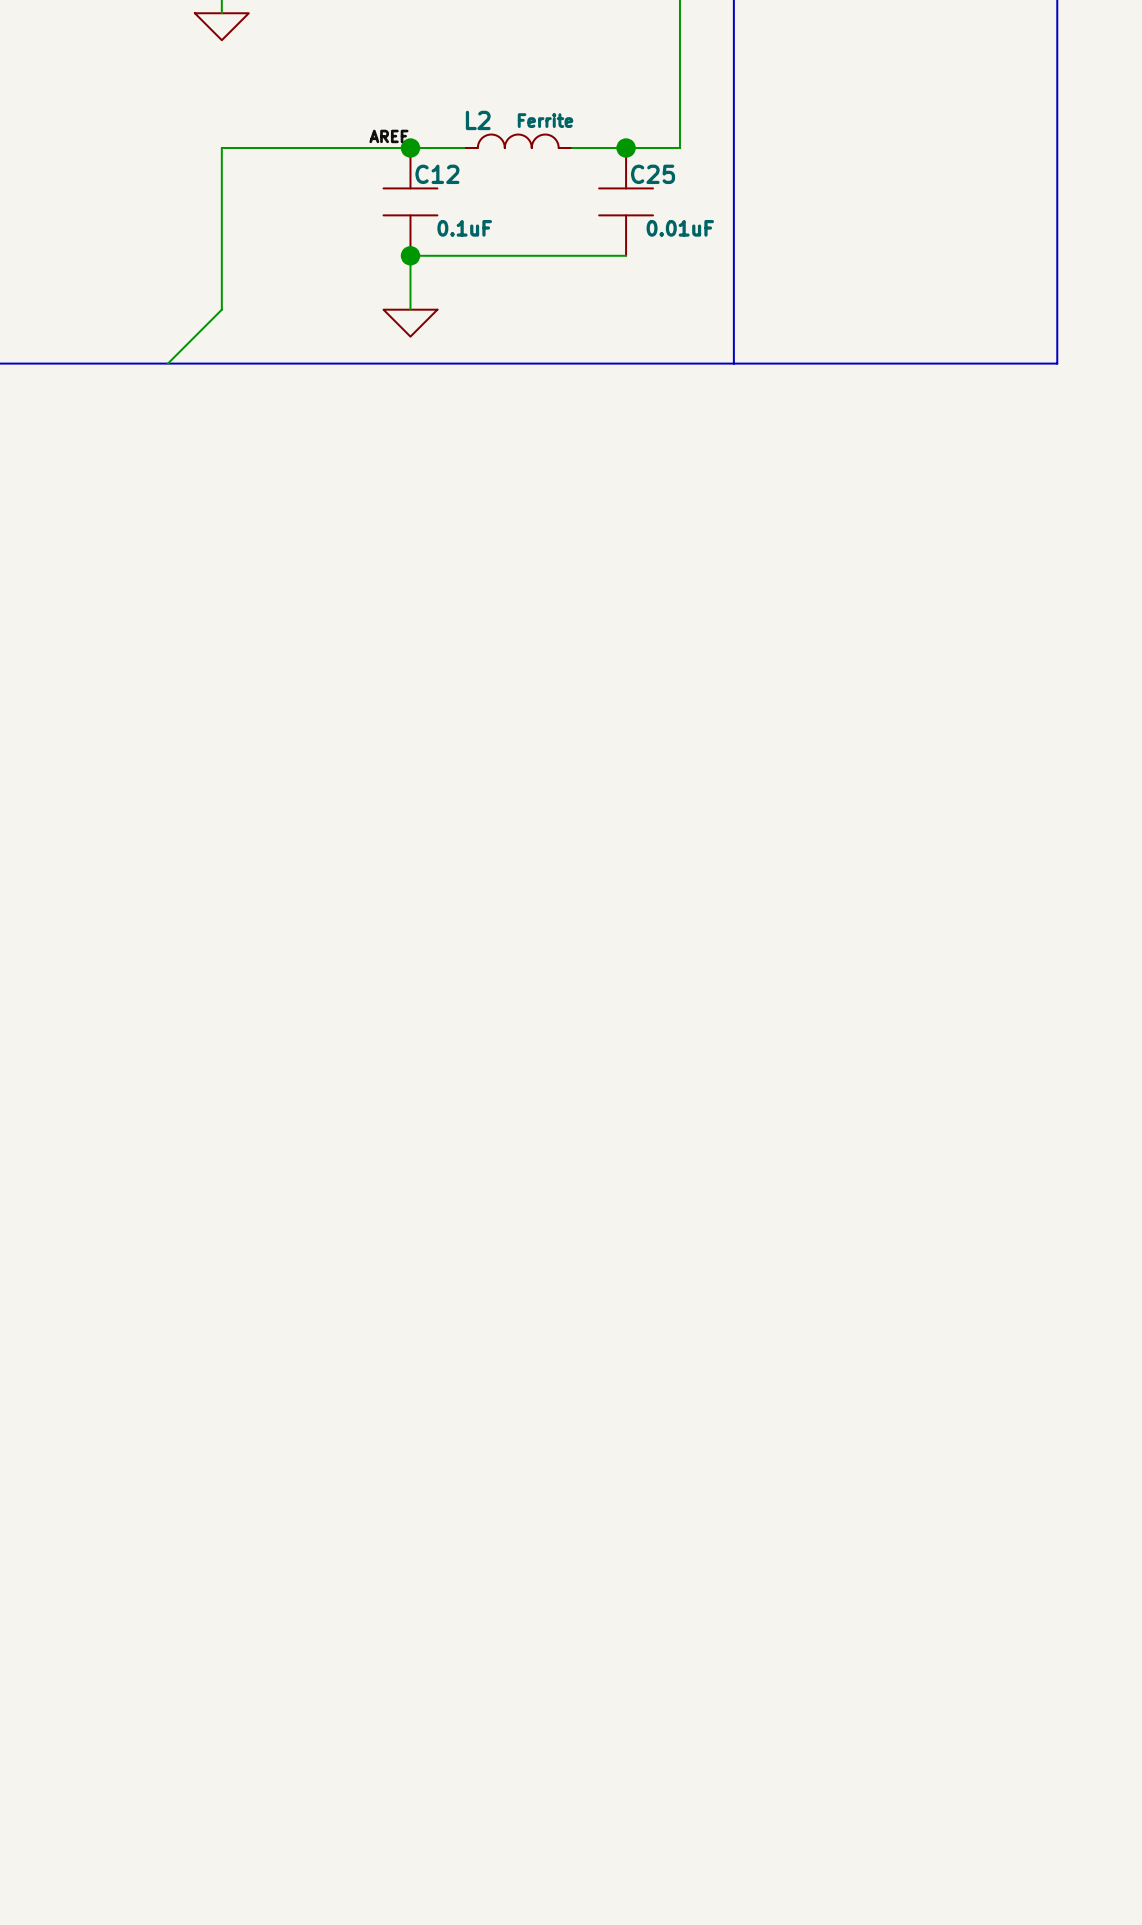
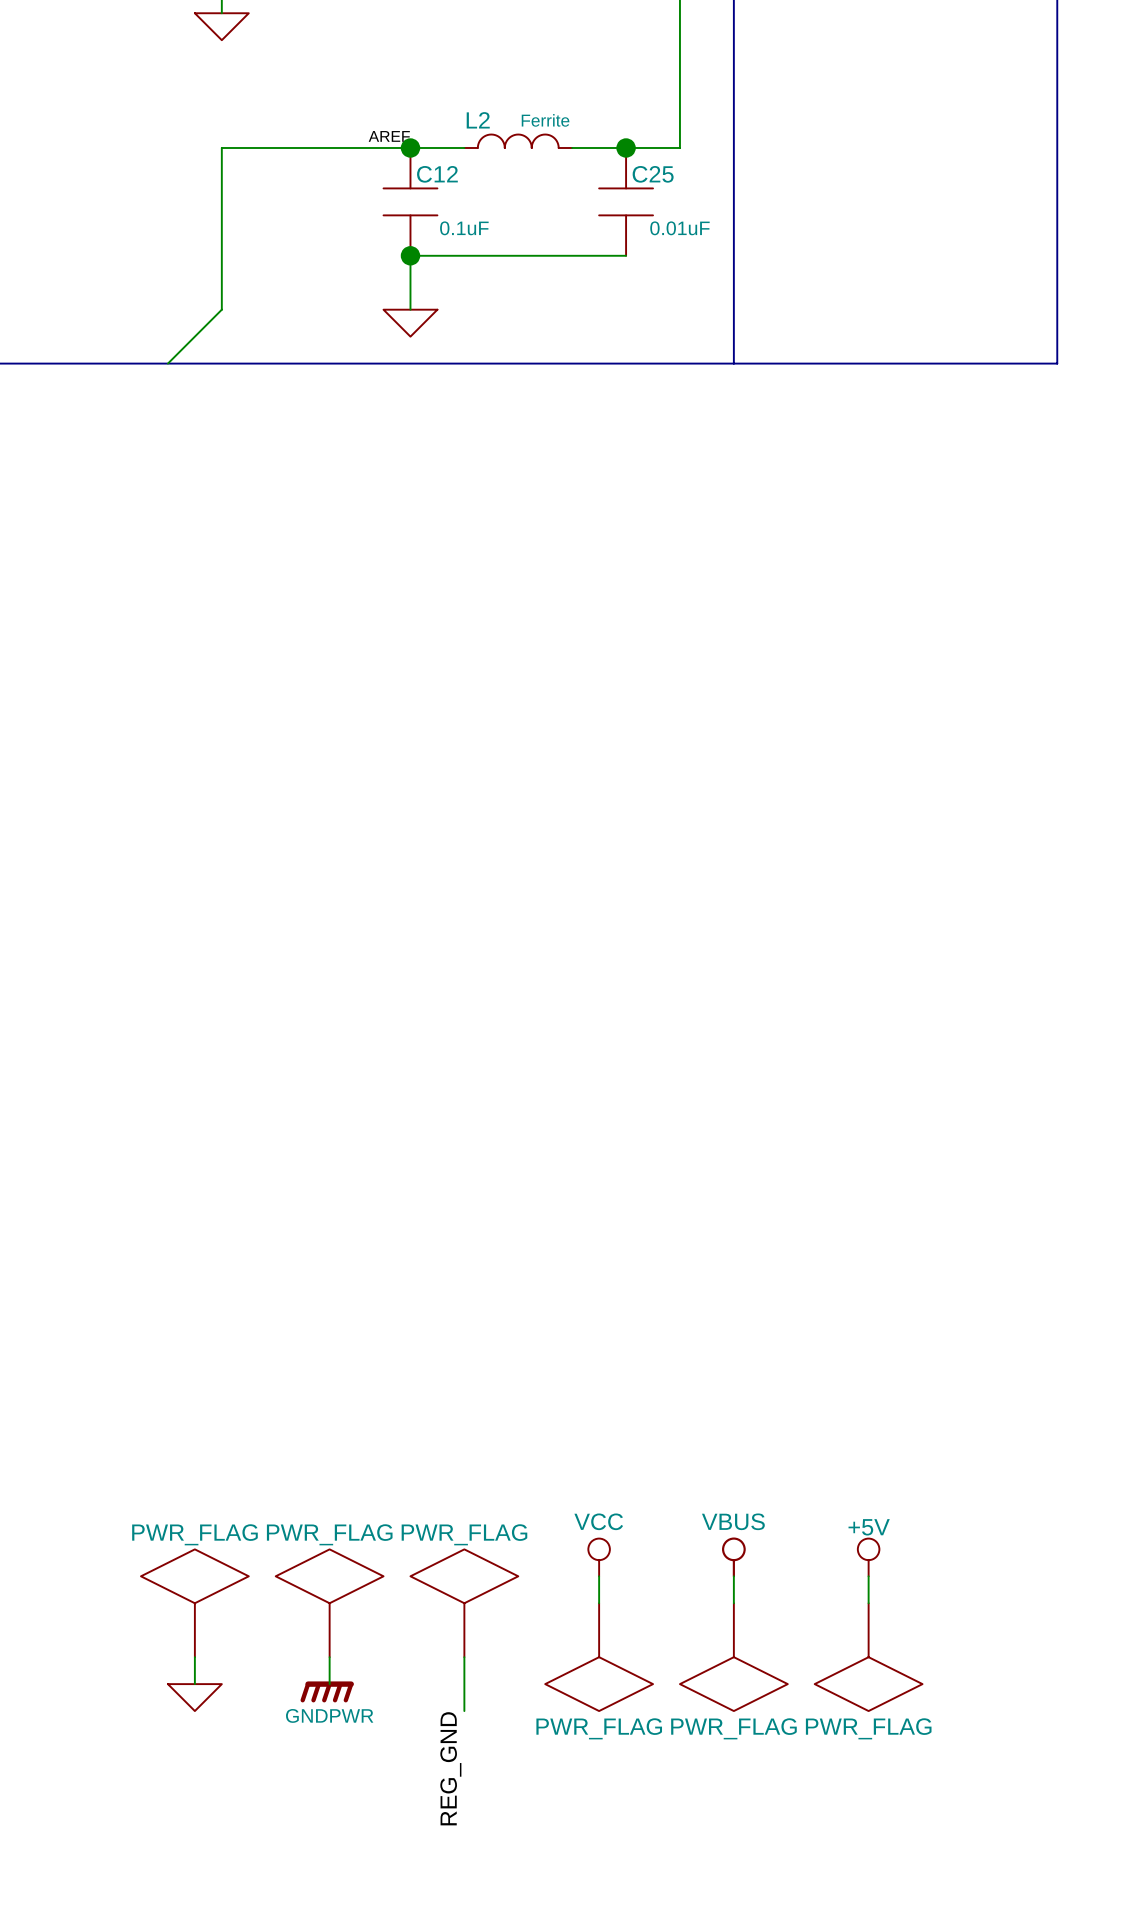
power symbol: none -> VCC (599, 1557)
power symbol: none -> VBUS (733, 1557)
power symbol: none -> +5V (868, 1557)
wire: none -> (599, 1576) (599, 1603)
wire: none -> (733, 1576) (733, 1603)
wire: none -> (868, 1576) (868, 1603)
power symbol: none -> PWR_FLAG (194, 1603)
power symbol: none -> PWR_FLAG (329, 1603)
power symbol: none -> PWR_FLAG (464, 1603)
wire: none -> (194, 1657) (194, 1684)
wire: none -> (329, 1657) (329, 1684)
wire: none -> (464, 1657) (464, 1711)
power symbol: none -> PWR_FLAG (599, 1657)
power symbol: none -> PWR_FLAG (733, 1657)
power symbol: none -> PWR_FLAG (868, 1657)
power symbol: none -> GNDPWR (327, 1691)
power symbol: none -> (194, 1697)
label: none -> REG_GND (450, 1768)

